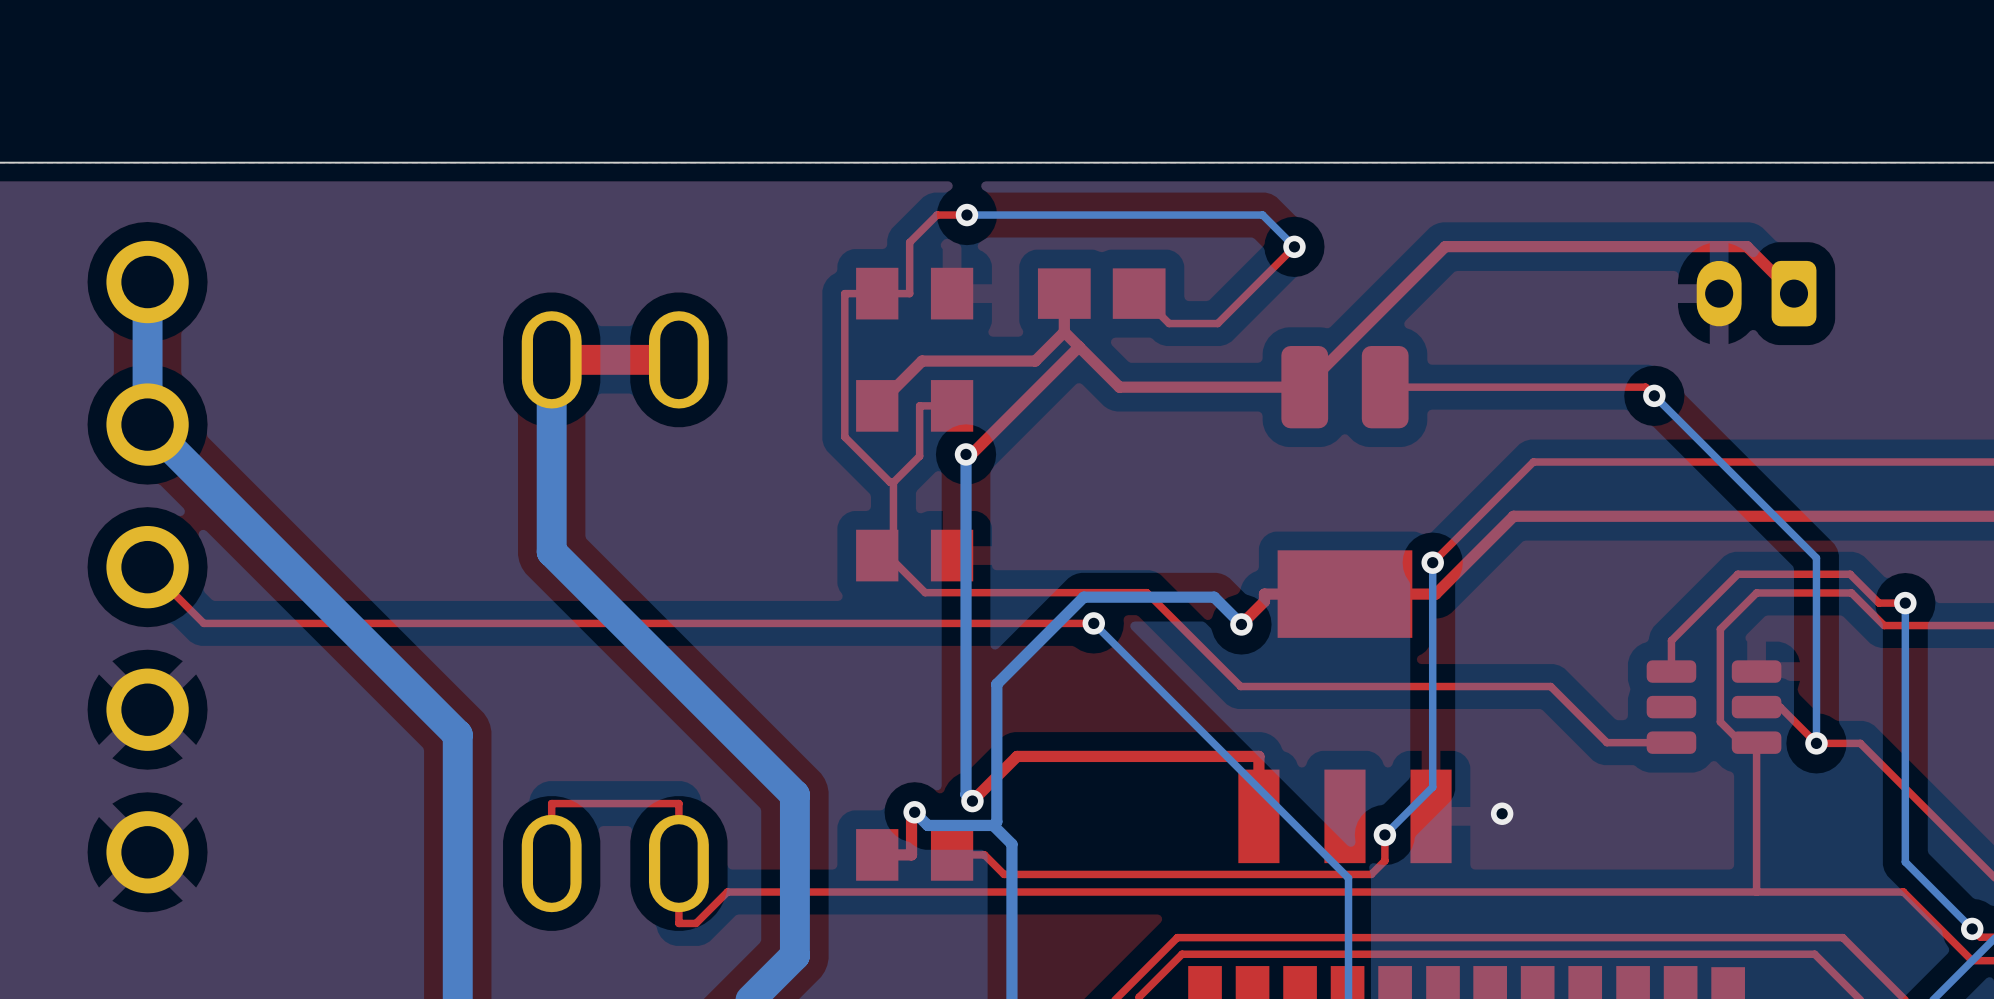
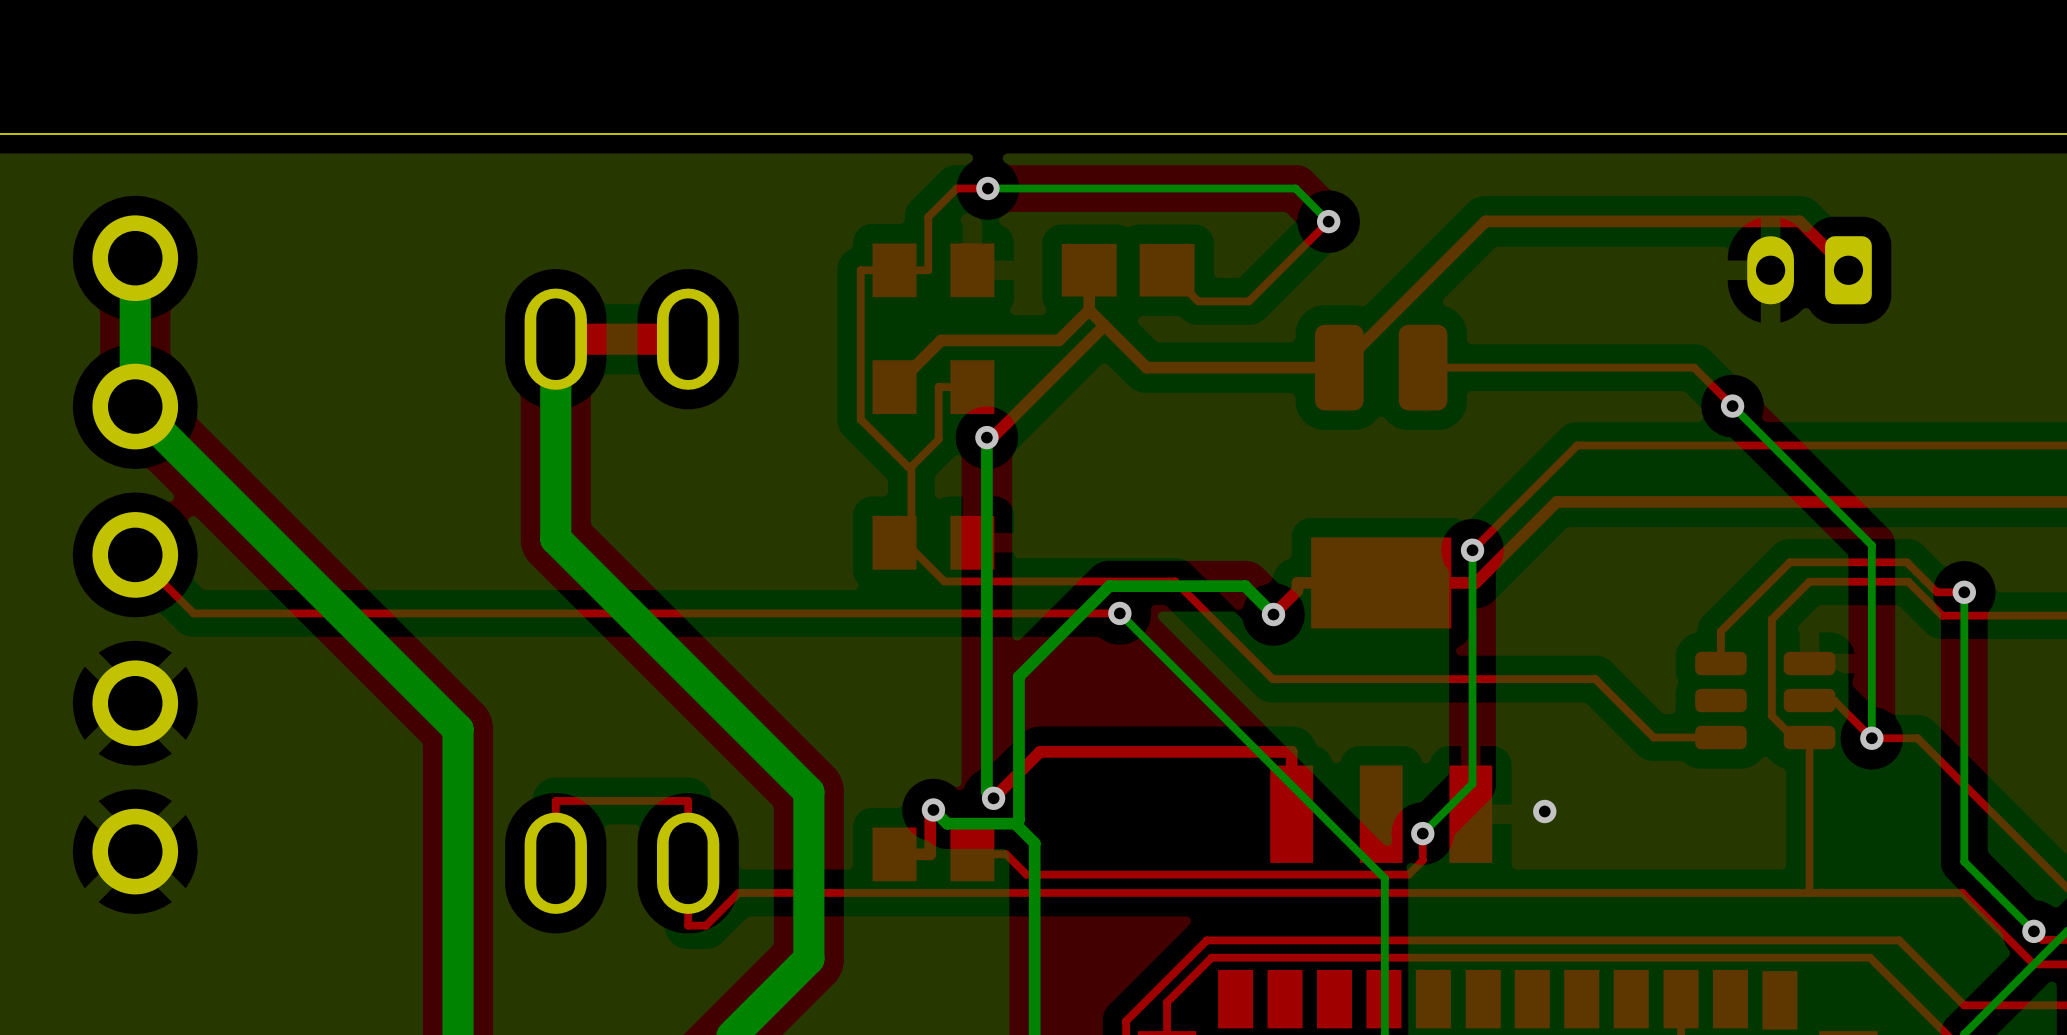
top track: none -> (1703, 376) (1732, 406)
bottom track: (1654, 395) (1682, 424) -> none
via position: (1654, 395) -> (1732, 406)

